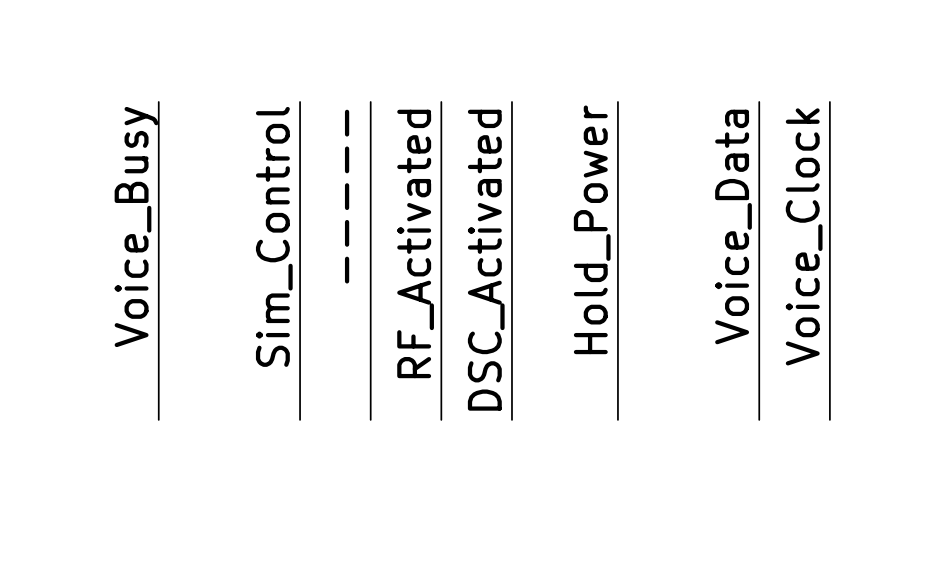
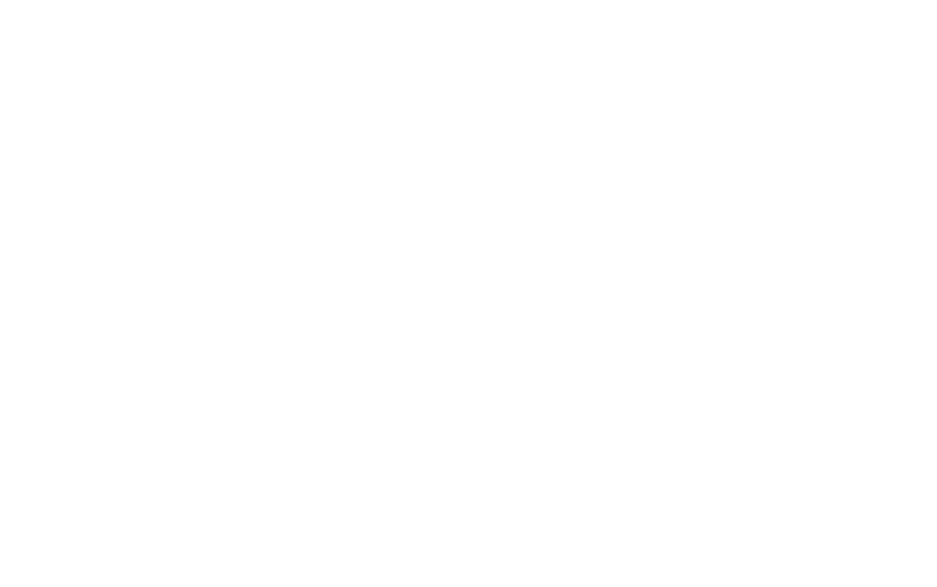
wire: (158, 101) (158, 419) -> none
wire: (300, 101) (300, 419) -> none
wire: (370, 101) (370, 419) -> none
wire: (441, 101) (441, 419) -> none
wire: (511, 101) (511, 419) -> none
wire: (617, 101) (617, 419) -> none
wire: (759, 101) (759, 419) -> none
wire: (829, 101) (829, 419) -> none
label: ----- (347, 196) -> none
label: Voice_Busy (136, 227) -> none
label: Voice_Data (733, 227) -> none
label: Hold_Power (592, 229) -> none
label: Sim_Control (274, 236) -> none
label: Voice_Clock (804, 236) -> none
label: RF_Activated (415, 243) -> none
label: DSC_Activated (486, 260) -> none

